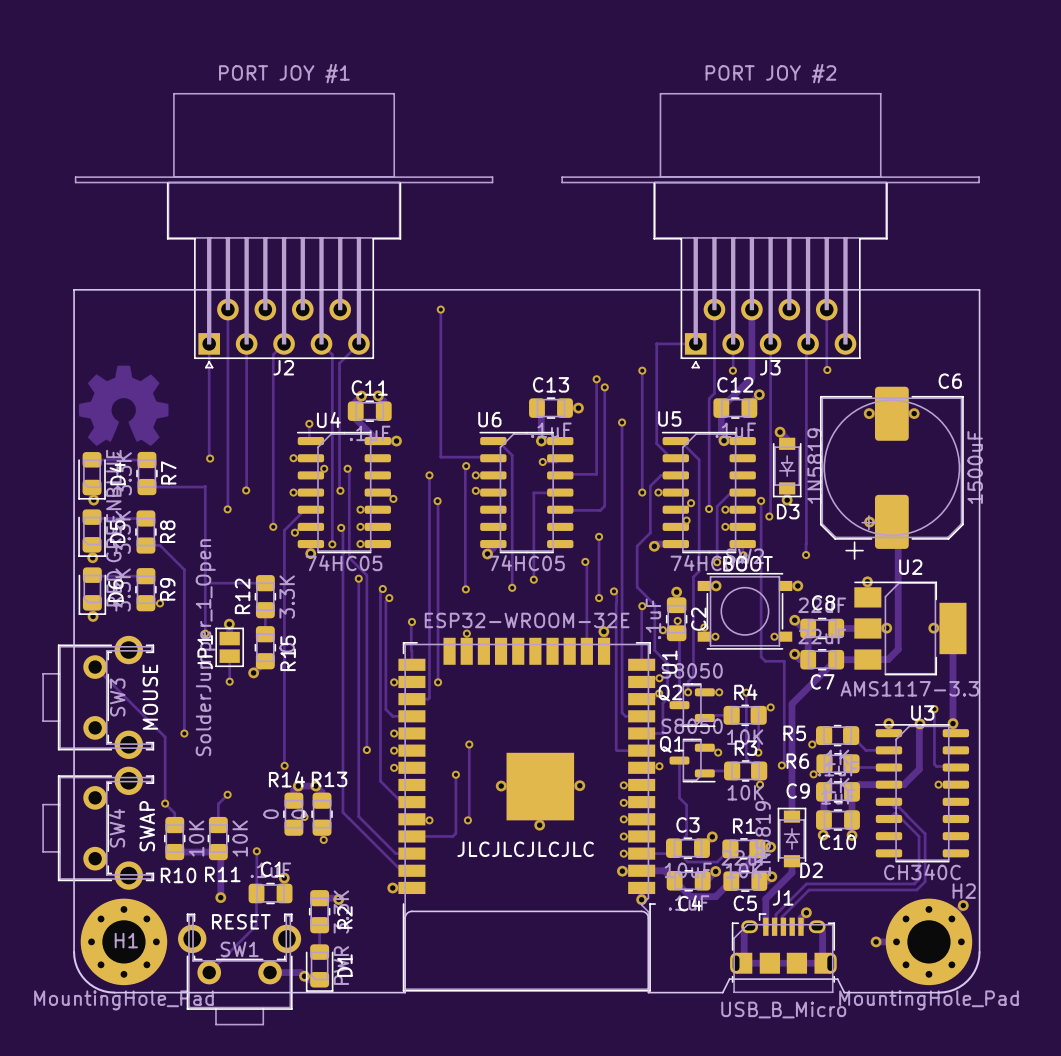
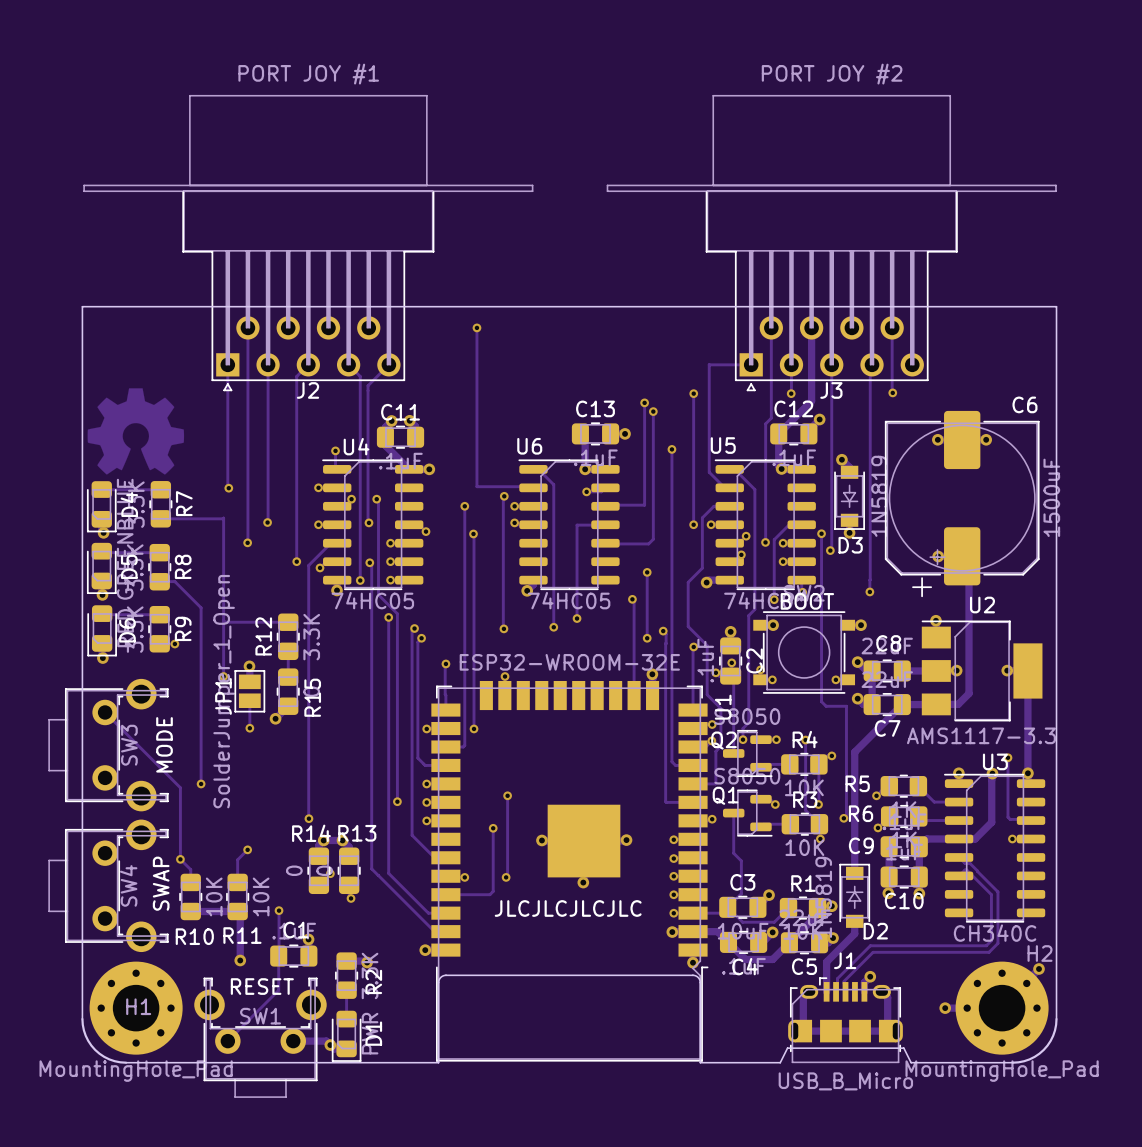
SW3 value: MOUSE (150, 697) -> MODE (164, 744)

